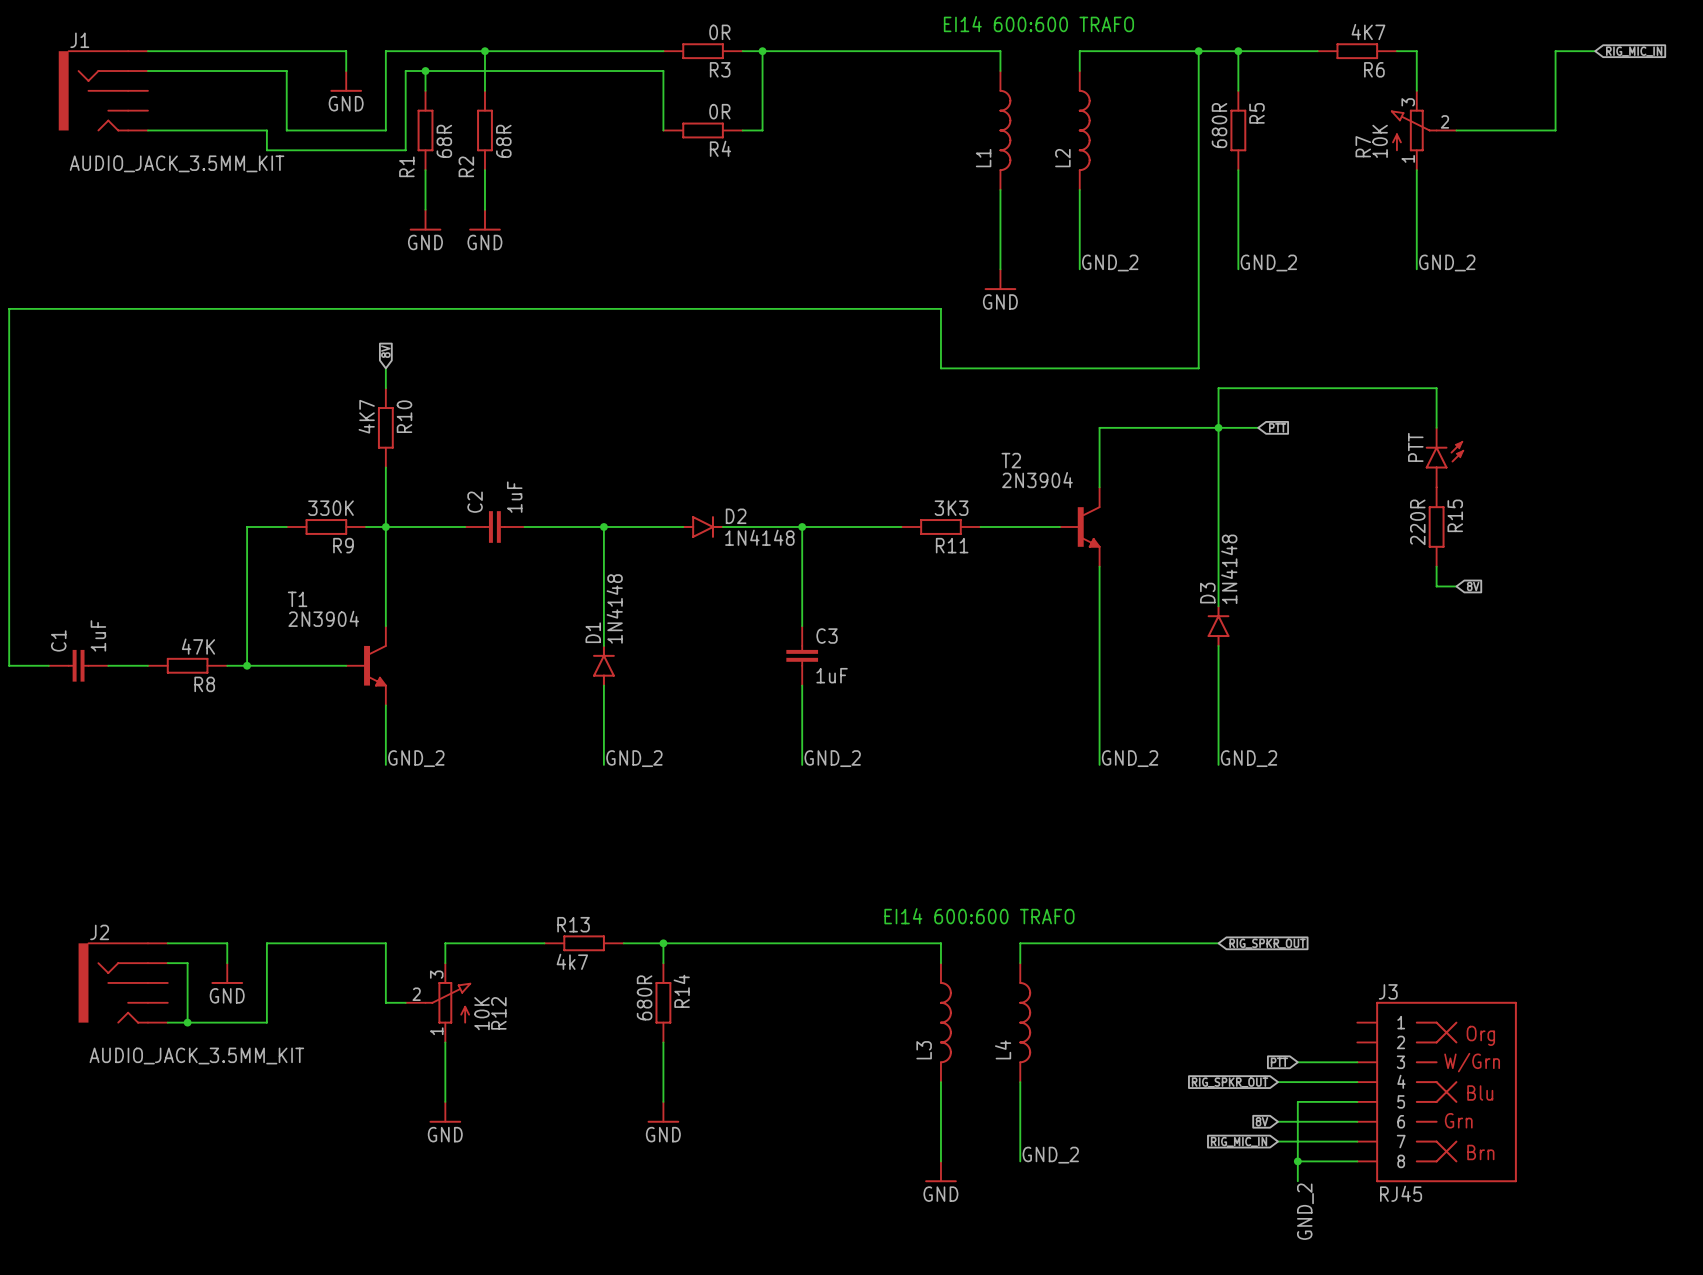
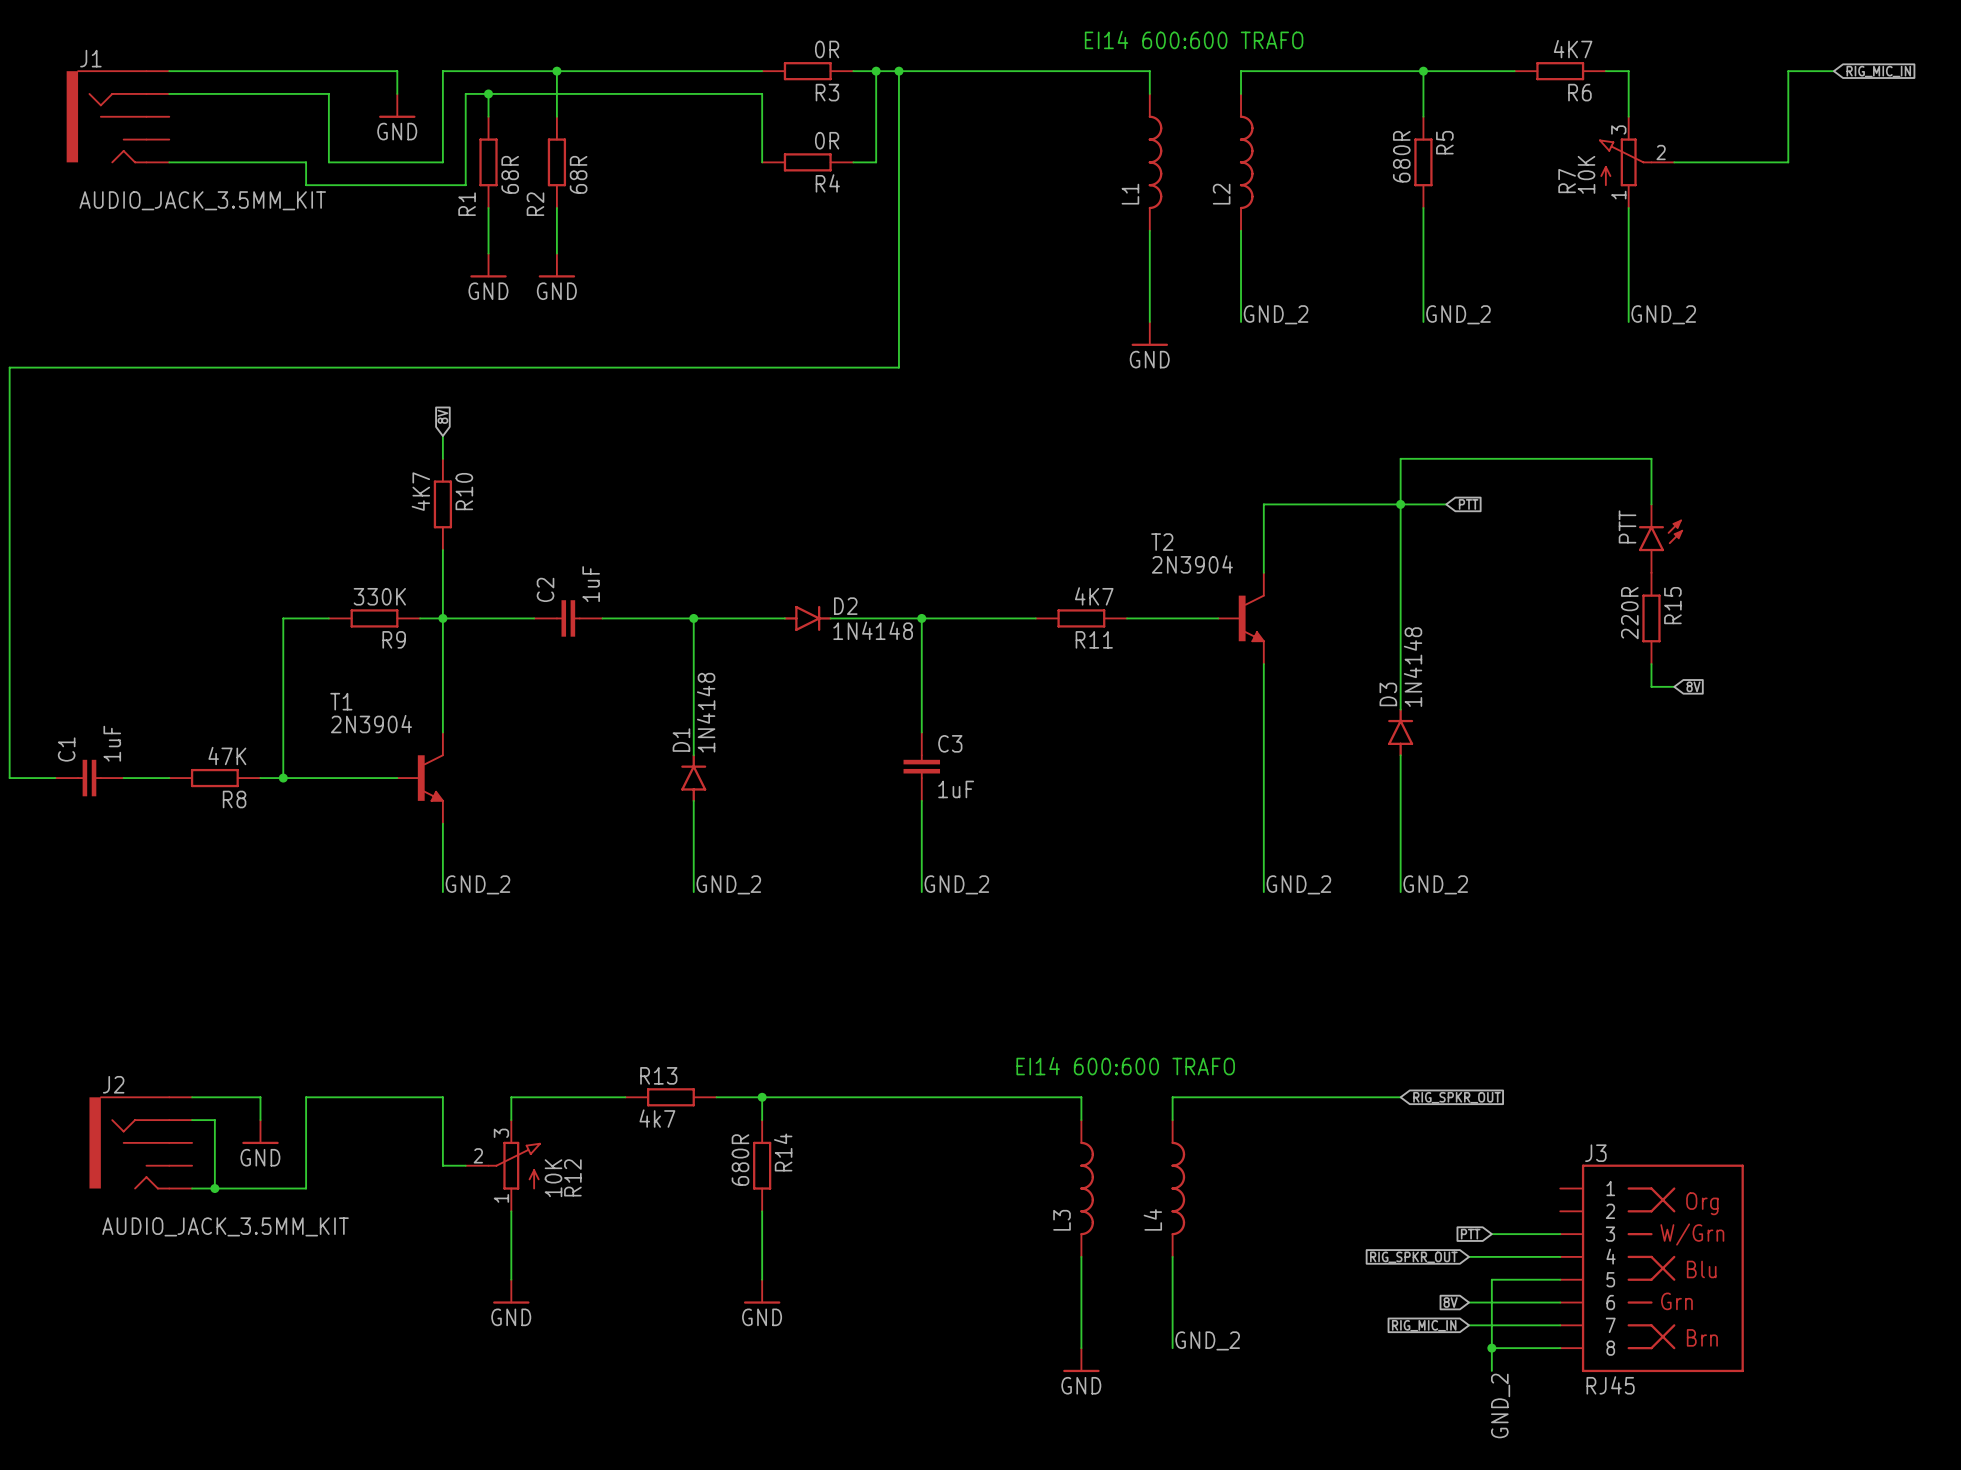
junction: none -> (898, 71)
wire: (1198, 51) (1198, 368) (940, 368) (940, 308) (782, 308) -> (898, 71) (898, 367)
junction: (1198, 51) -> none
R11 value: 3K3 (951, 508) -> 4K7 (1094, 596)

